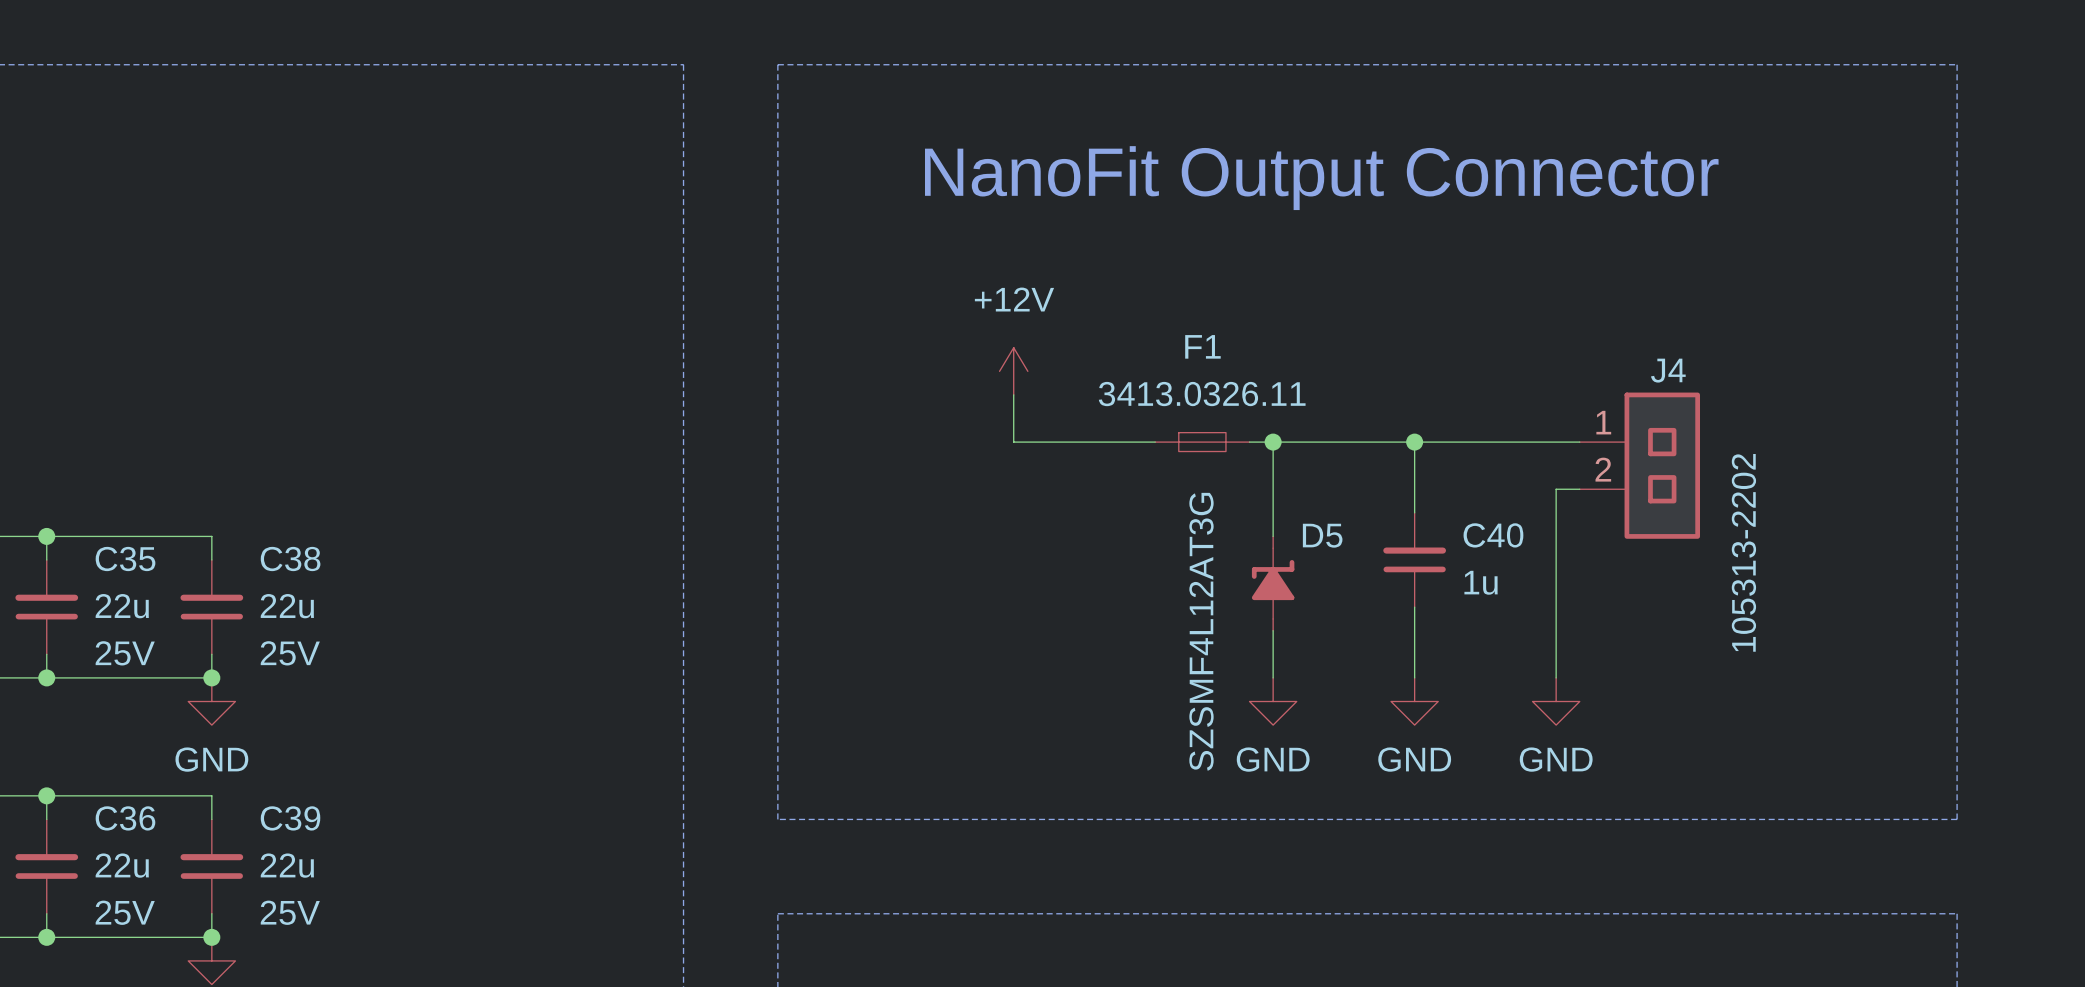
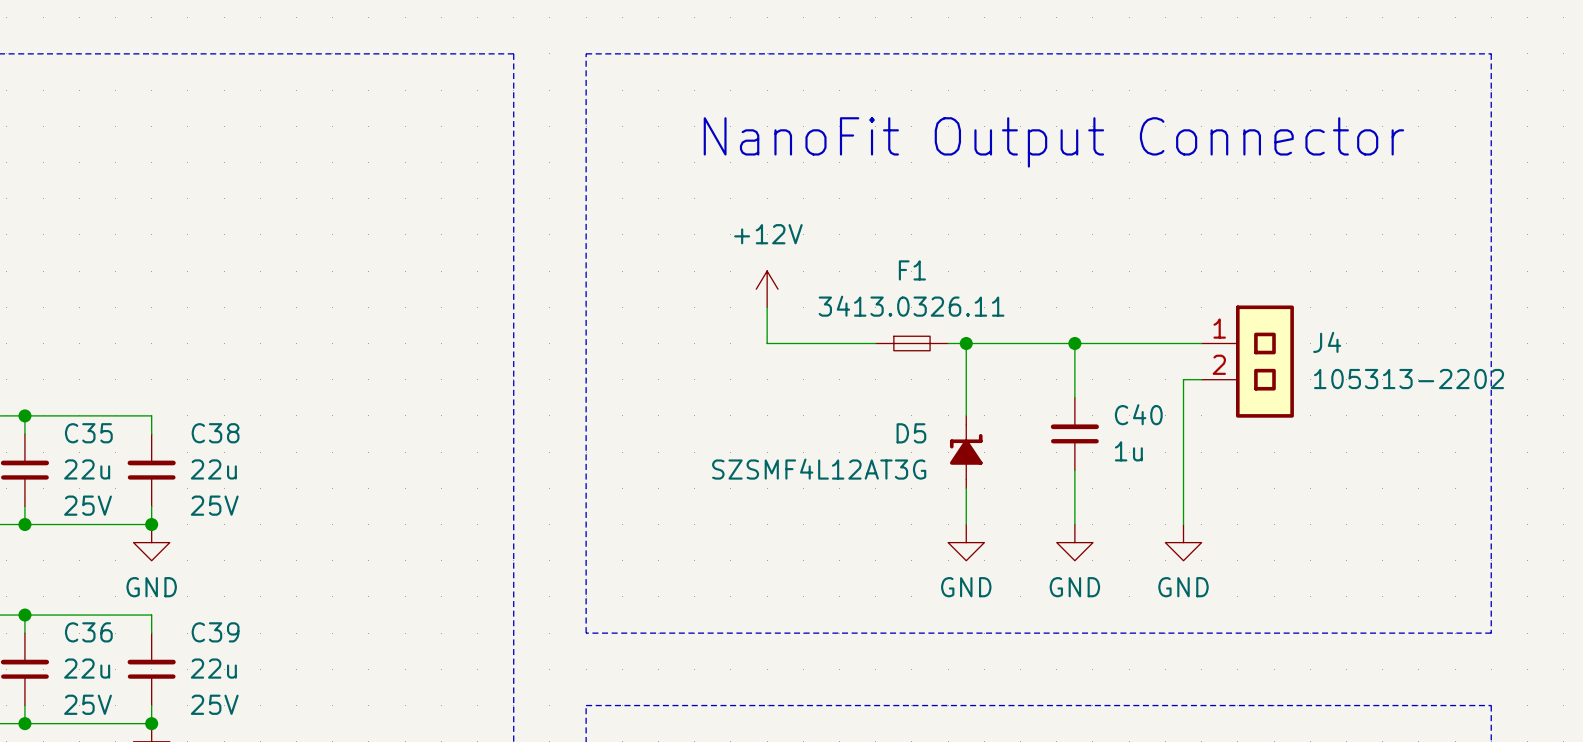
J4 name position: J4 (1668, 370) -> J4 (1327, 342)
D5 name position: D5 (1322, 535) -> D5 (911, 433)
J4 text rotation: 0° (1743, 552) -> 90° clockwise (1409, 379)
D5 text rotation: 0° (1201, 631) -> 90° clockwise (819, 469)

